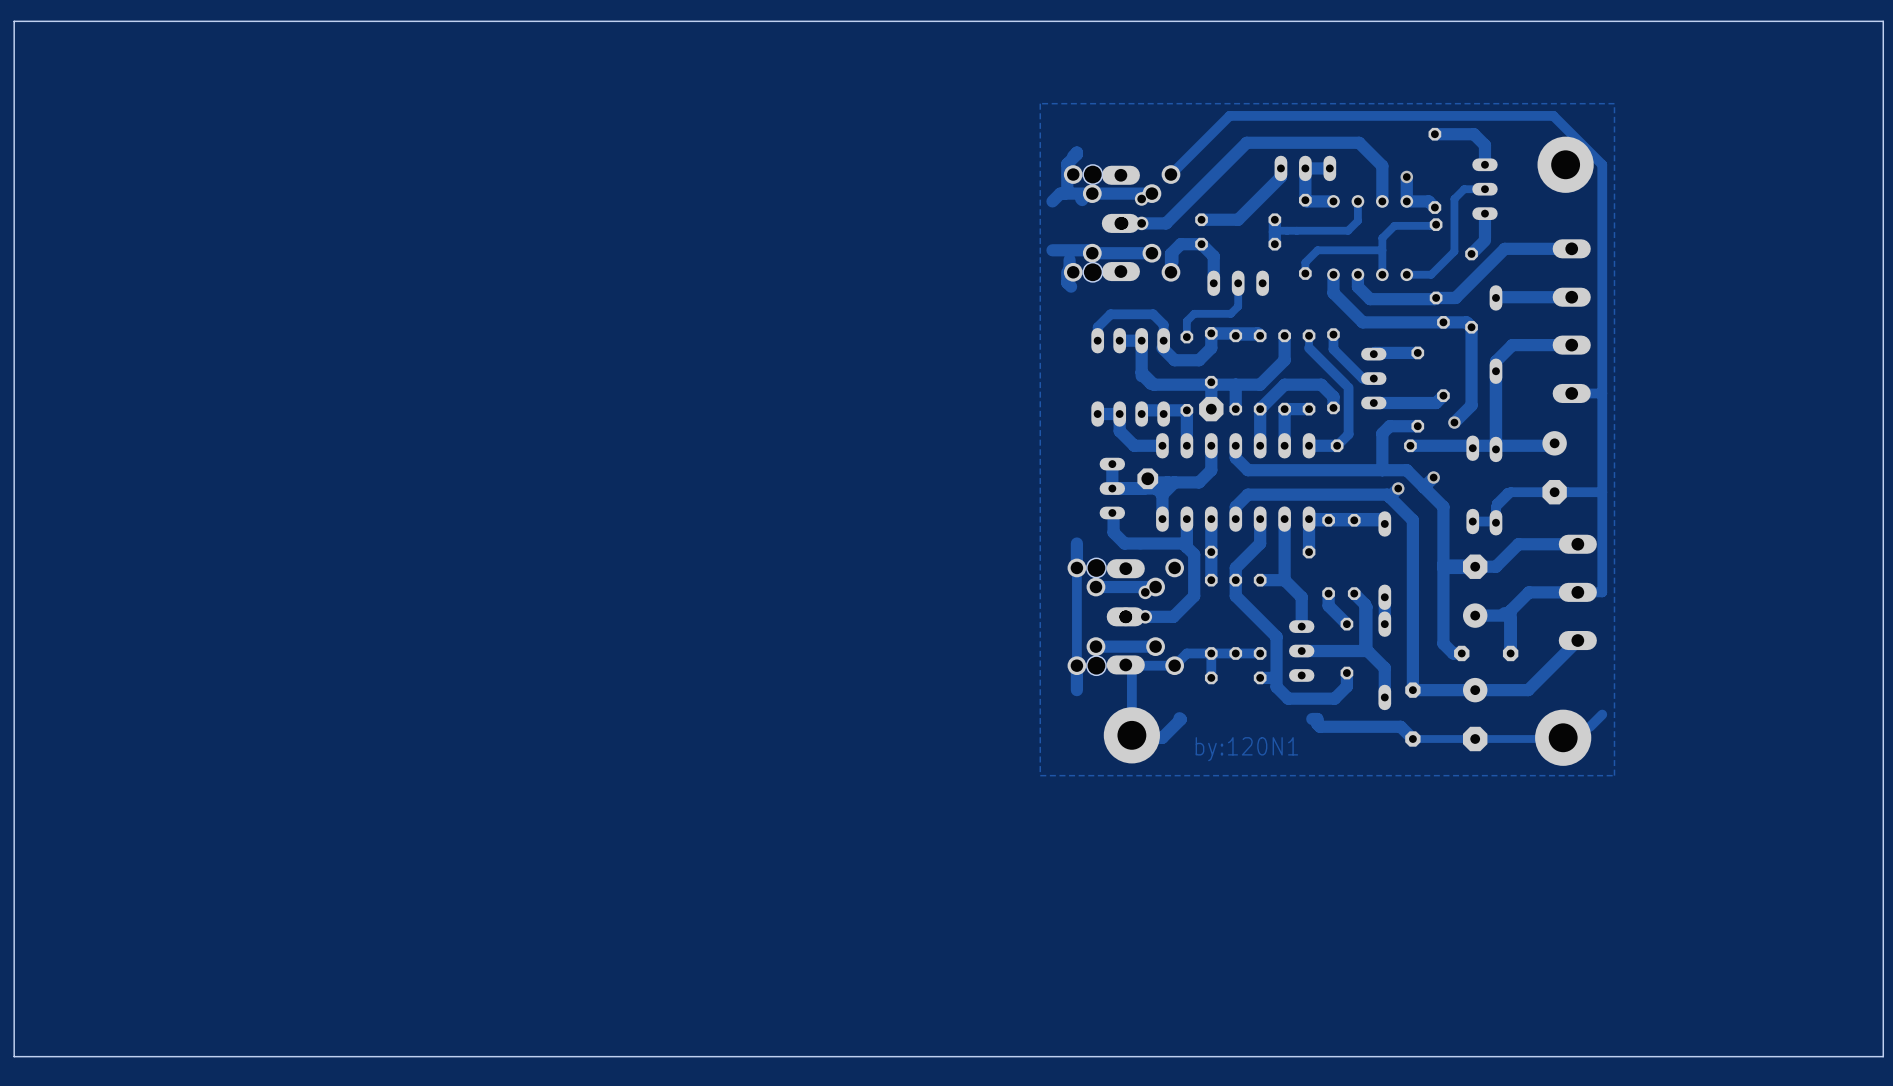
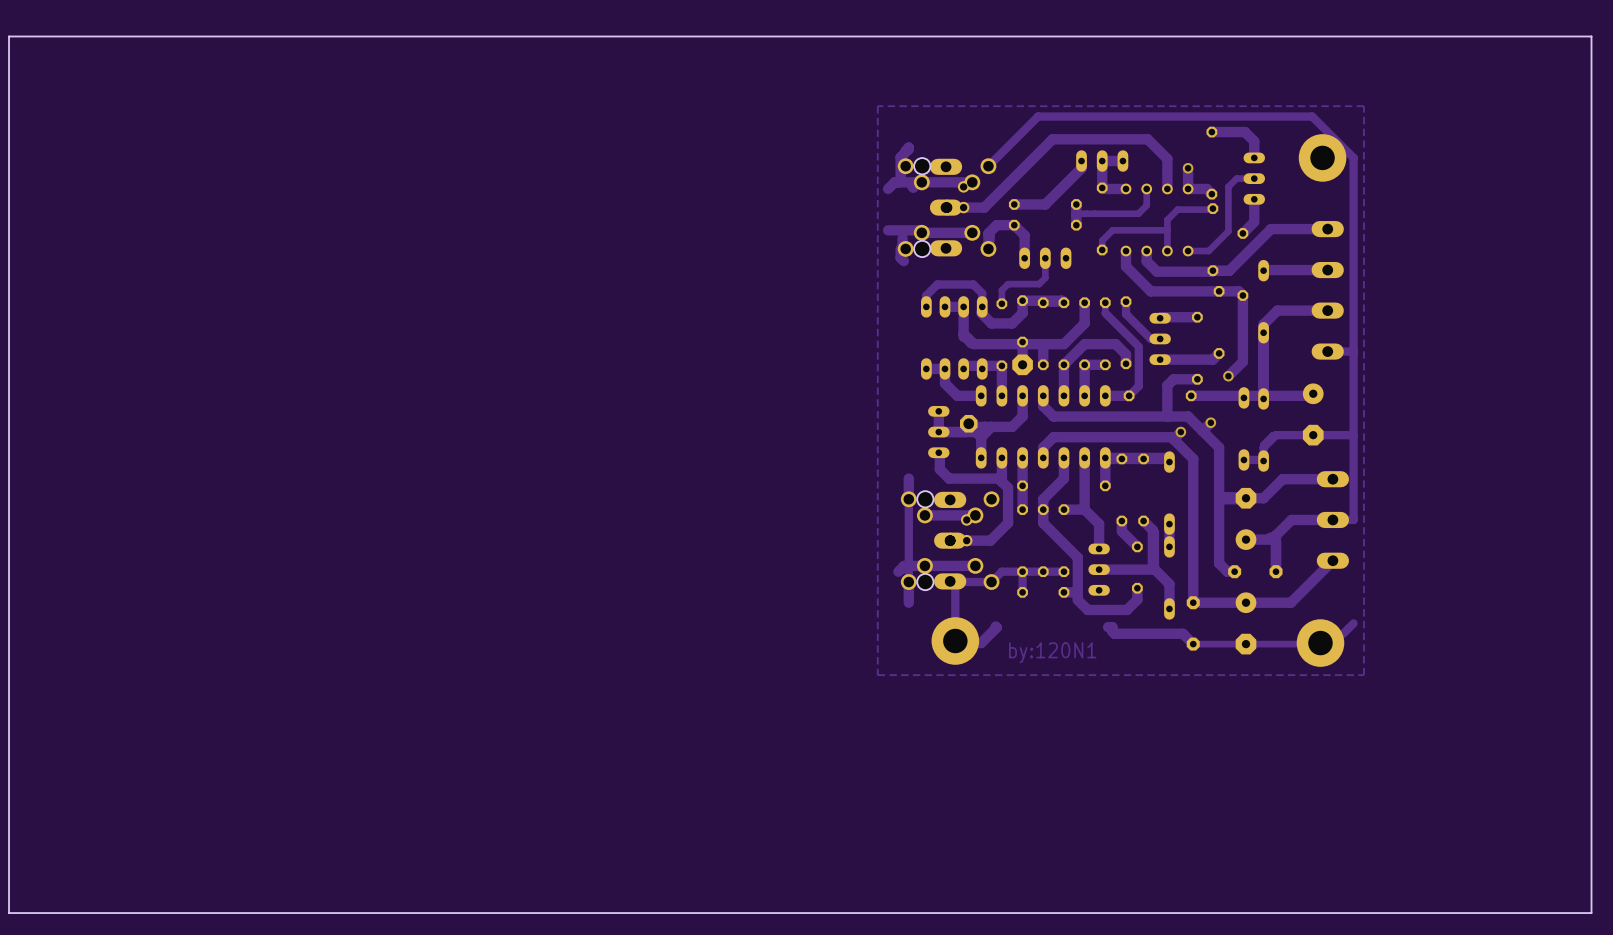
track: none -> (924, 565) (904, 565) (898, 571)

